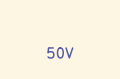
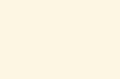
text: 50V (60, 52) -> none

